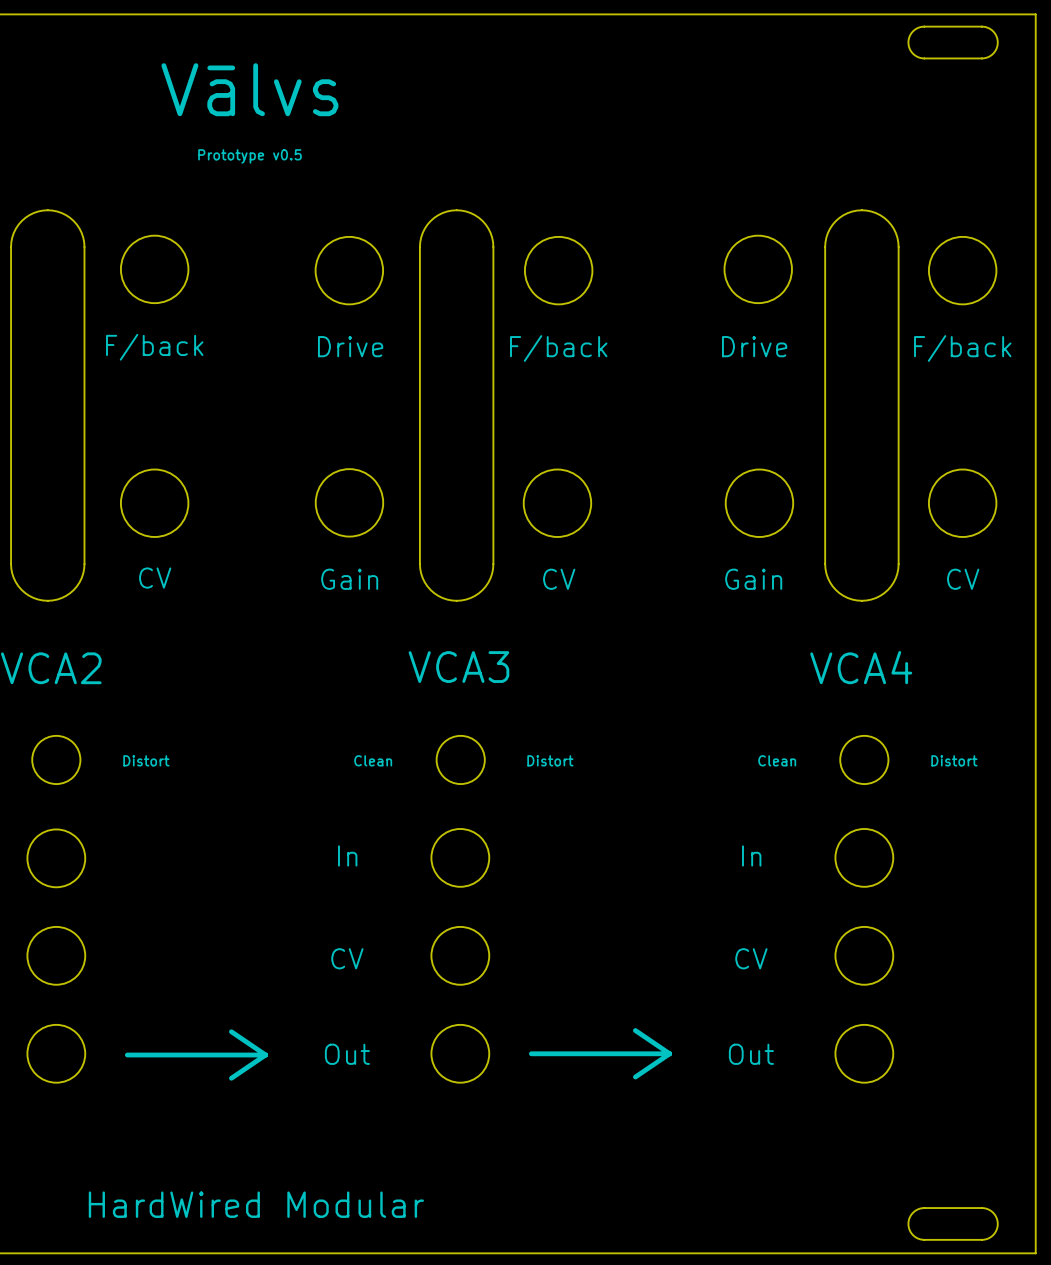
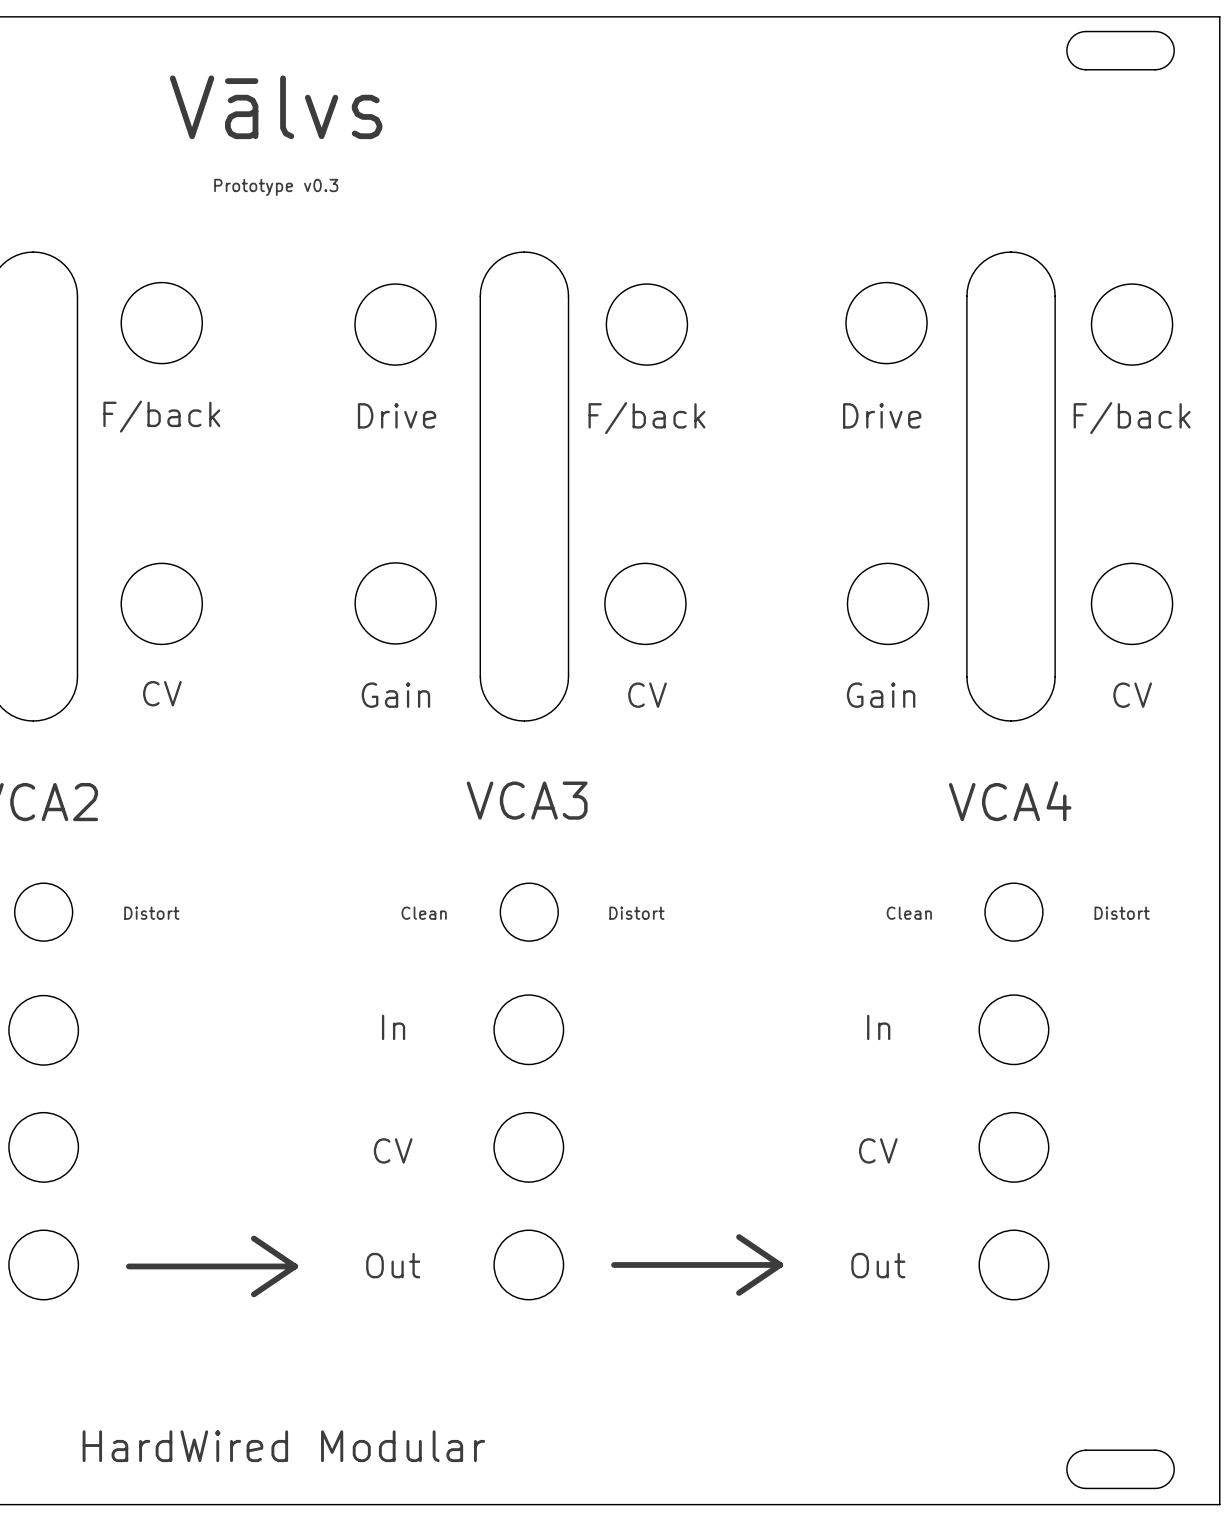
text: Prototype v0.5 (249, 156) -> Prototype v0.3 (276, 187)

